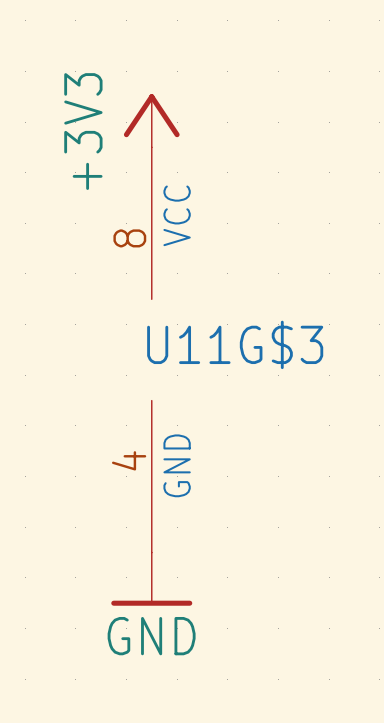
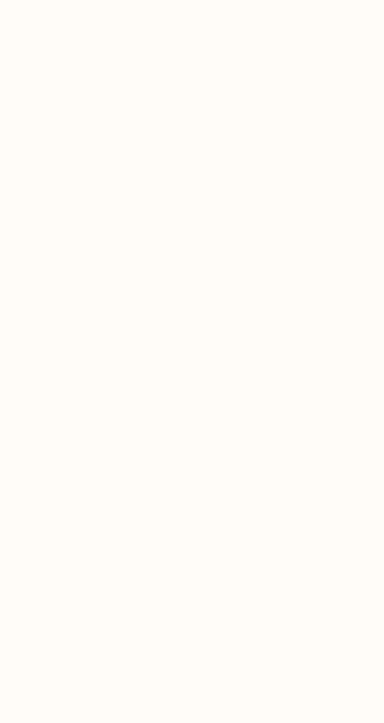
power symbol: +3V3 (151, 120) -> none
U11G$3: (151, 349) -> none
power symbol: GND (151, 579) -> none

